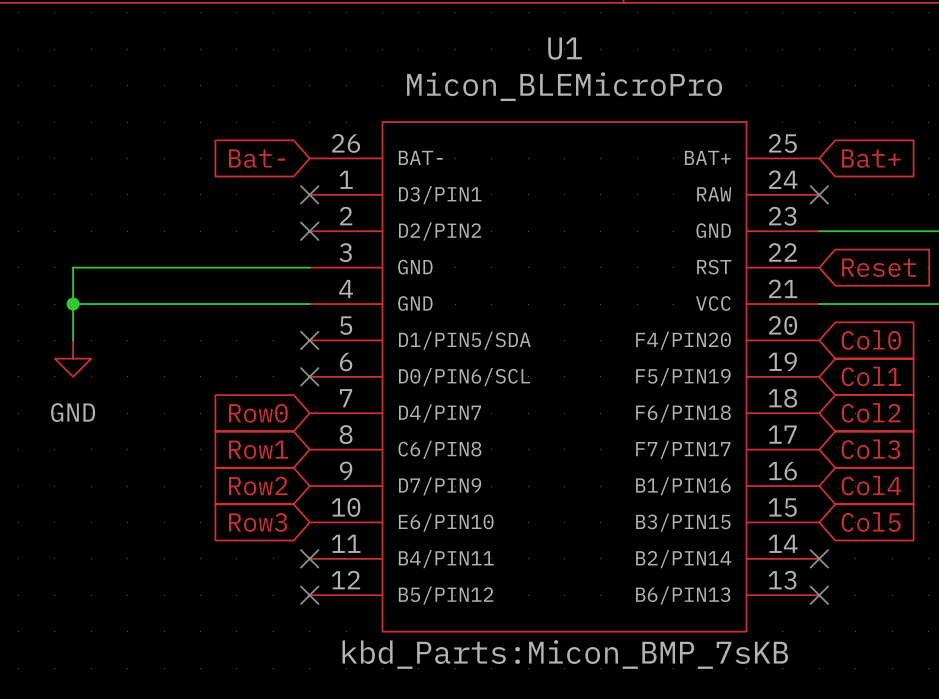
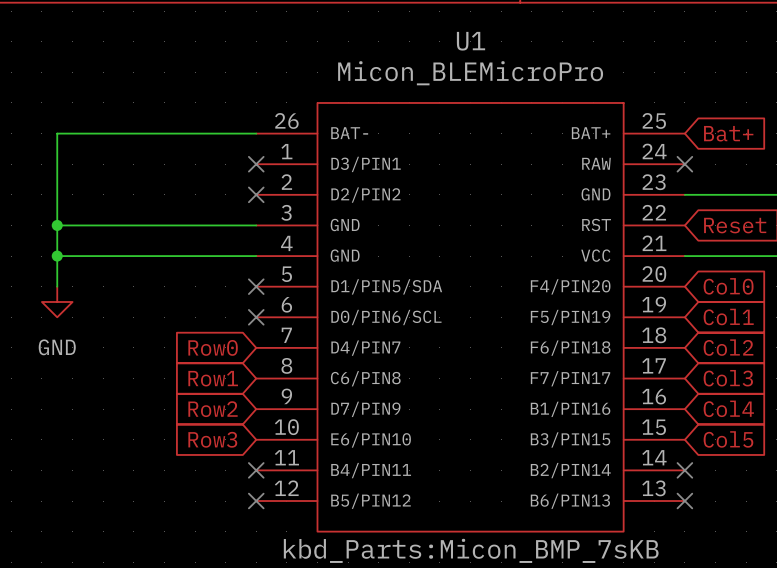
global label: Bat- (257, 158) -> none
wire: none -> (256, 133) (57, 133) (57, 225)
junction: none -> (57, 225)

